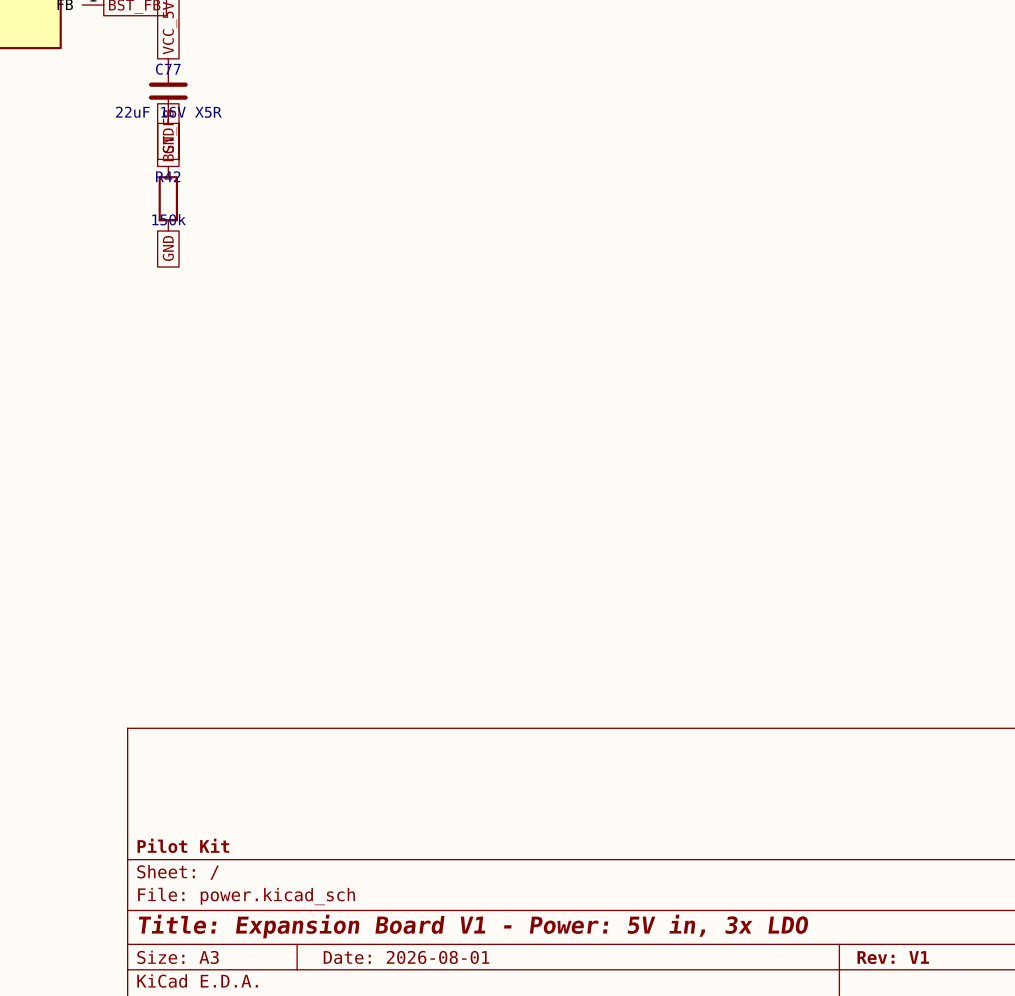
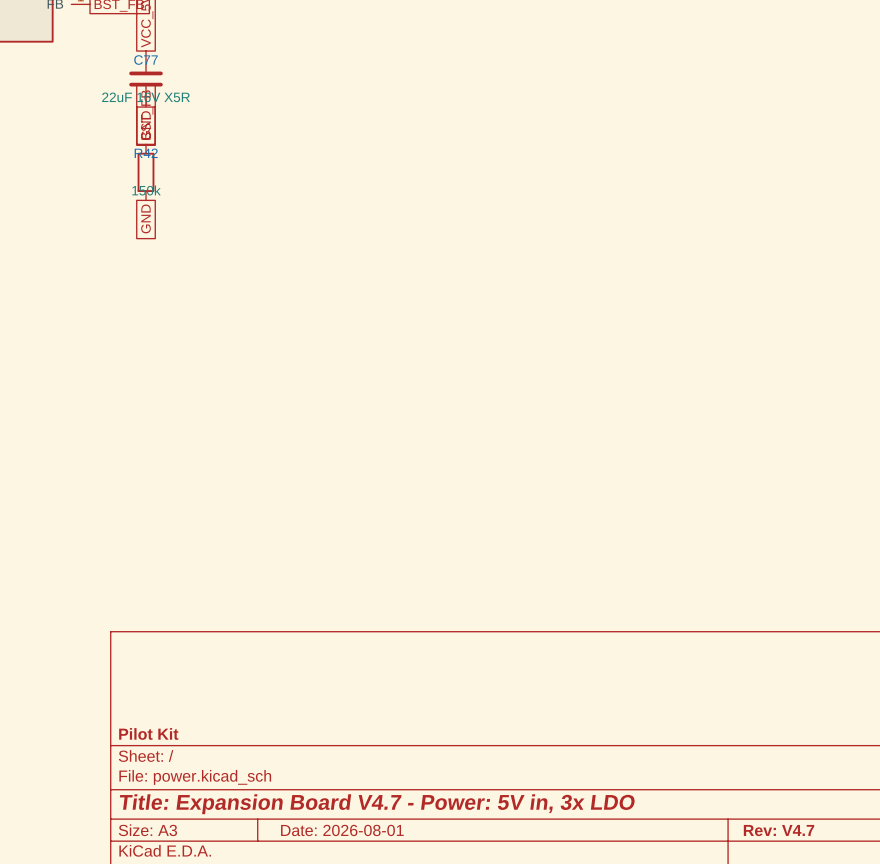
title block: Title: Expansion Board V1 - Power: 5V in, 3x LDO (473, 926) -> Title: Expansion Board V4.7 - Power: 5V in, 3x LDO (377, 804)
title block: Rev: V1 (893, 957) -> Rev: V4.7 (779, 830)

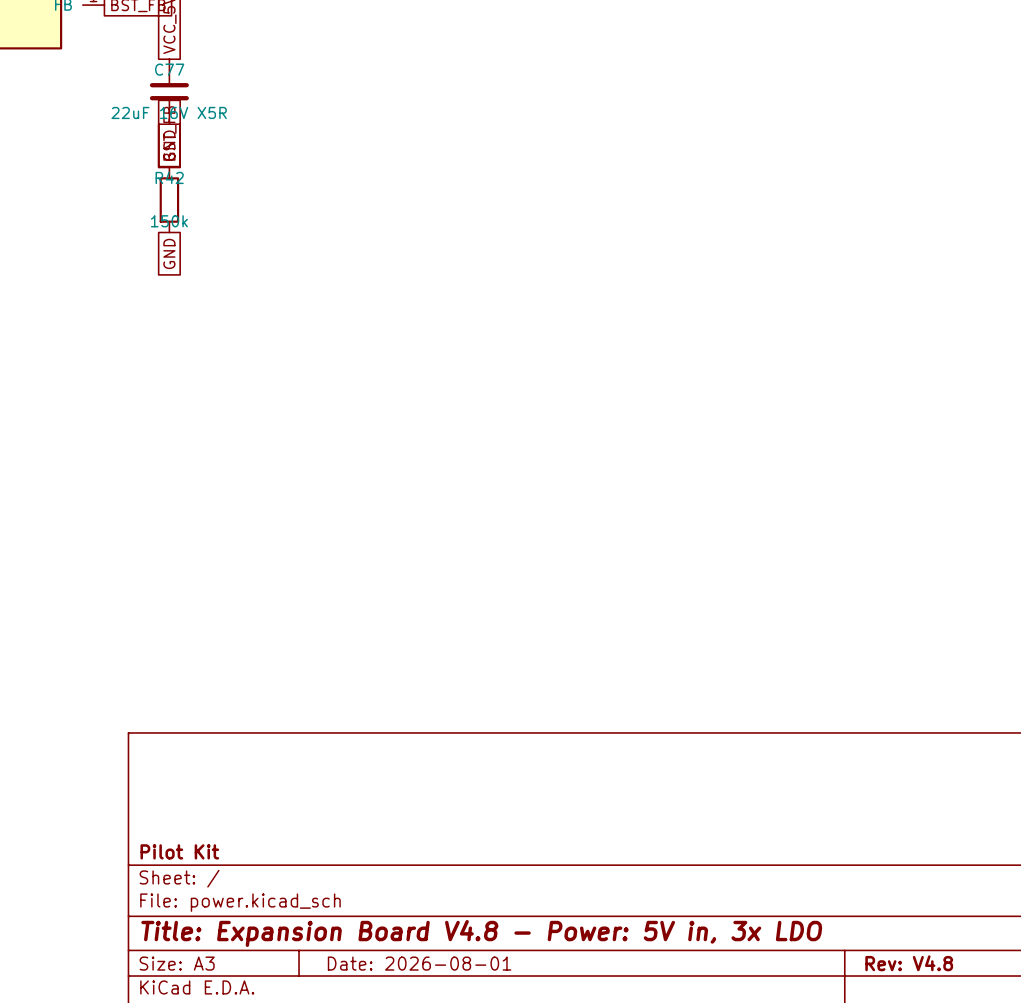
title block: Title: Expansion Board V4.7 - Power: 5V in, 3x LDO (377, 804) -> Title: Expansion Board V4.8 - Power: 5V in, 3x LDO (481, 933)
title block: Rev: V4.7 (779, 830) -> Rev: V4.8 (909, 963)

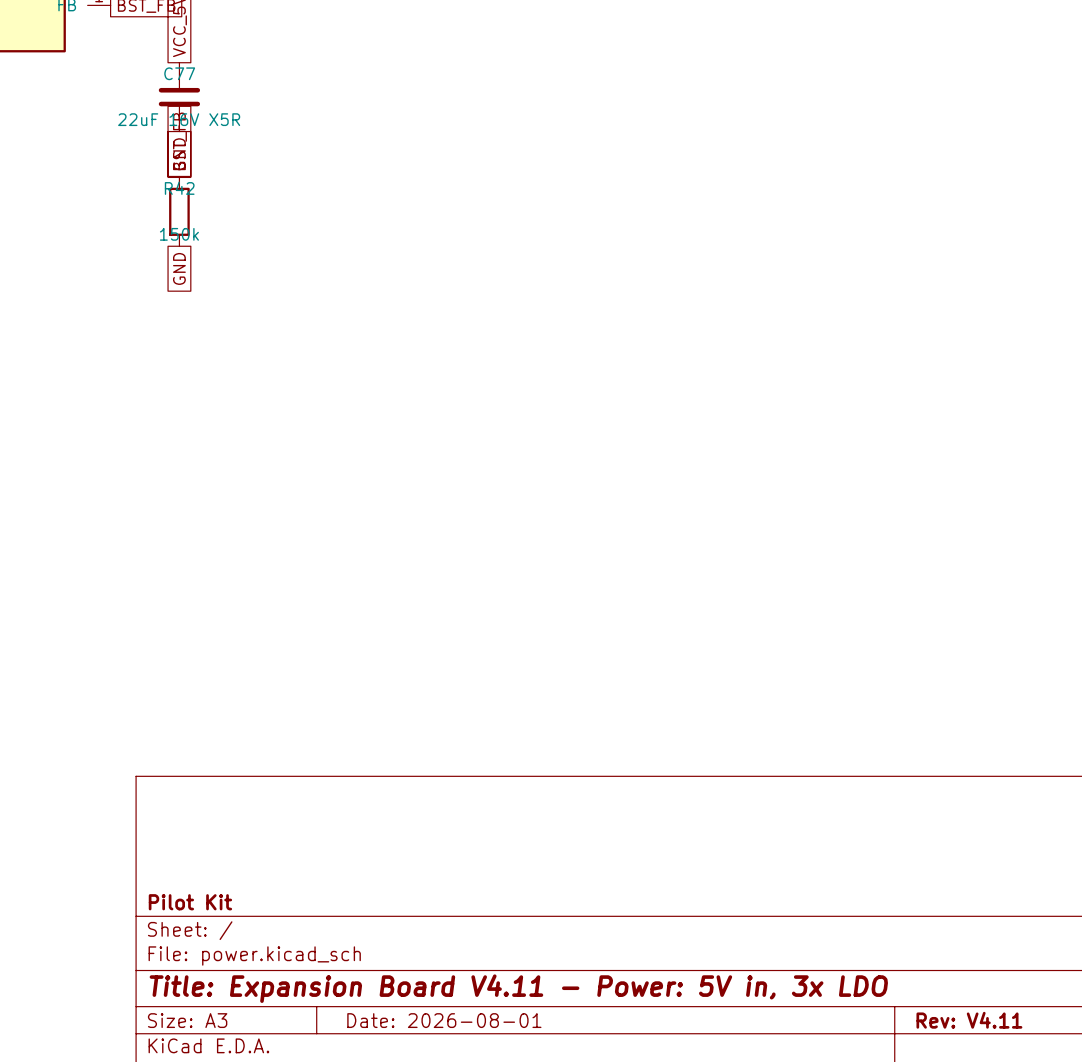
title block: Title: Expansion Board V4.8 - Power: 5V in, 3x LDO (481, 933) -> Title: Expansion Board V4.11 - Power: 5V in, 3x LDO (518, 988)
title block: Rev: V4.8 (909, 963) -> Rev: V4.11 (969, 1020)

